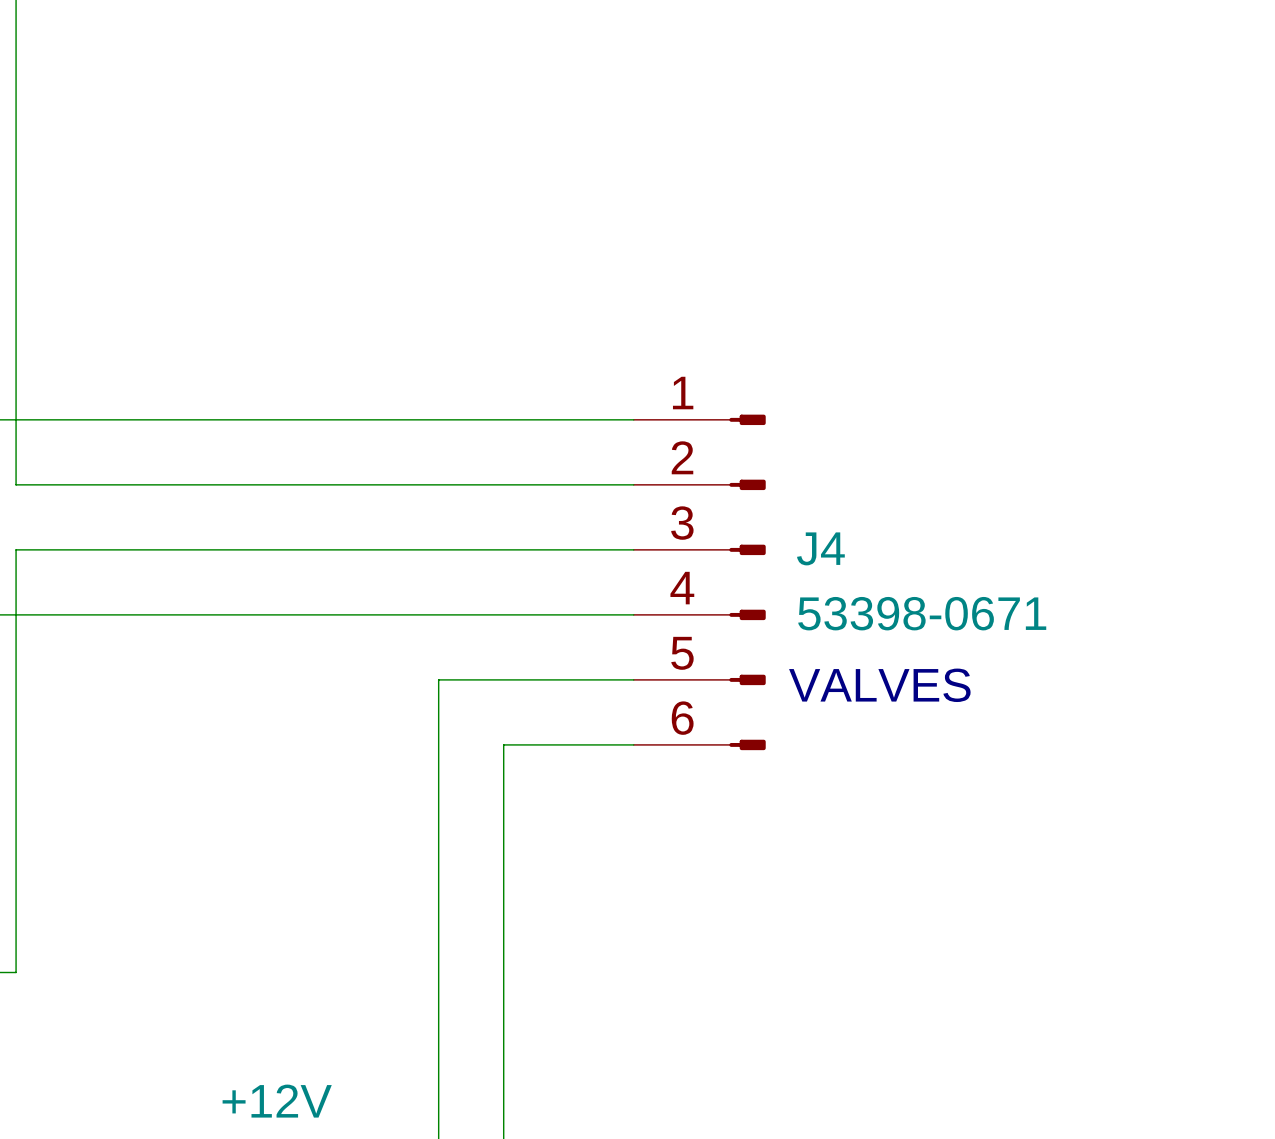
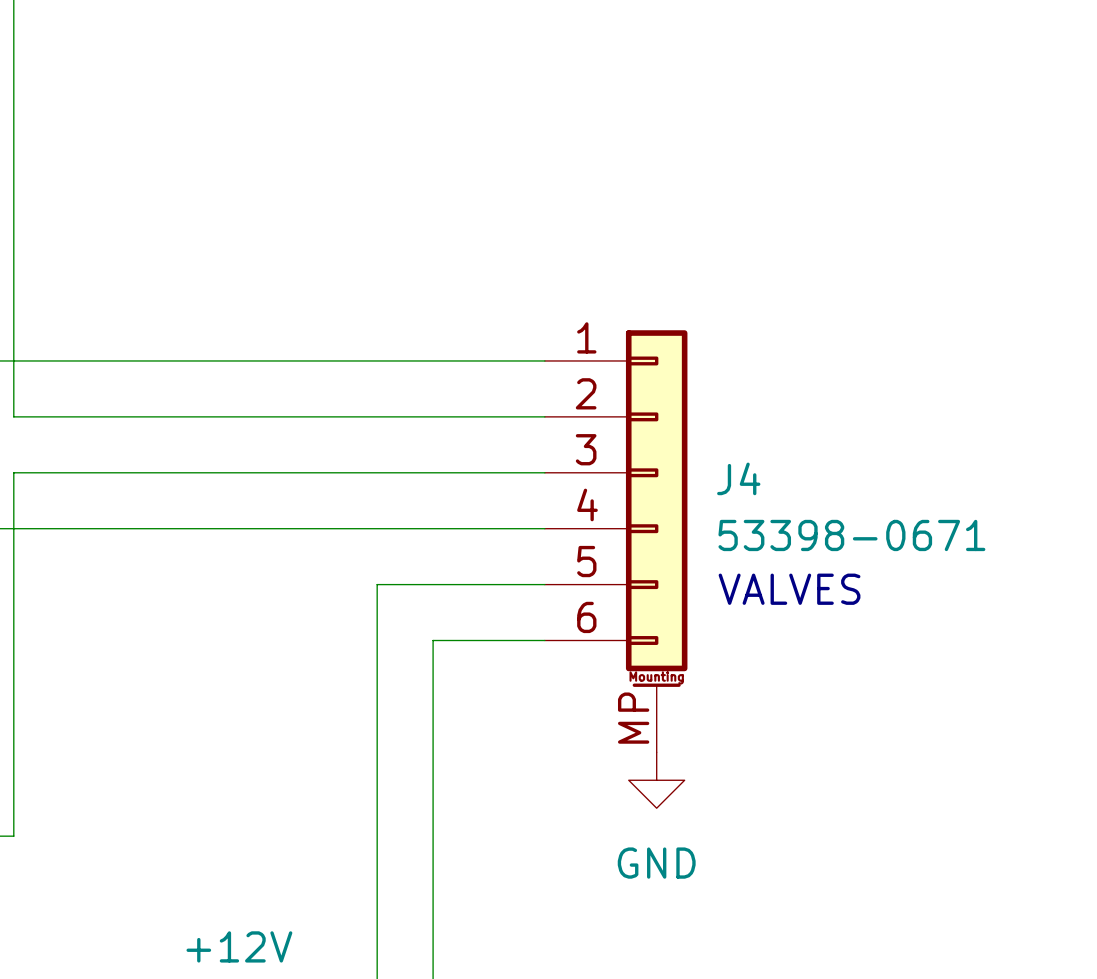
J4 symbol: [633, 414, 766, 751] -> [544, 330, 688, 753]
text position: VALVES (879, 685) -> VALVES (789, 589)
power symbol: none -> GND (656, 780)

